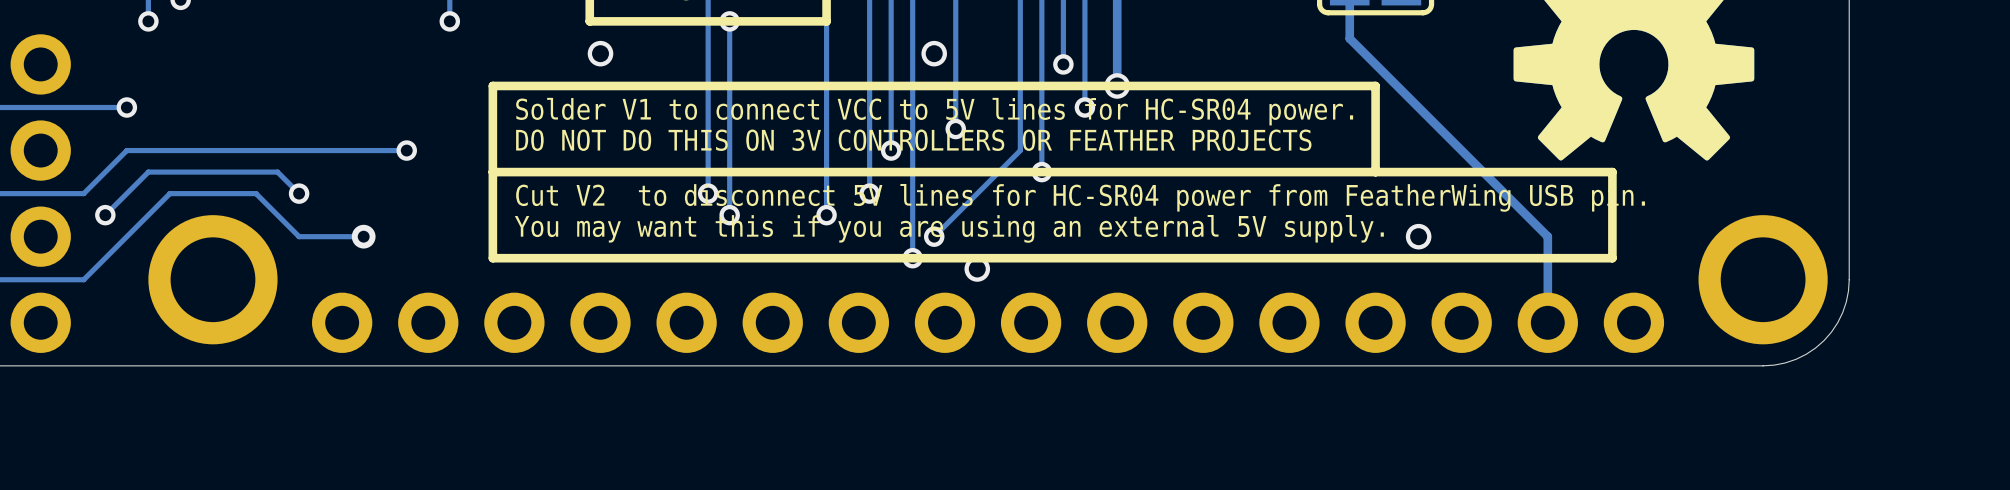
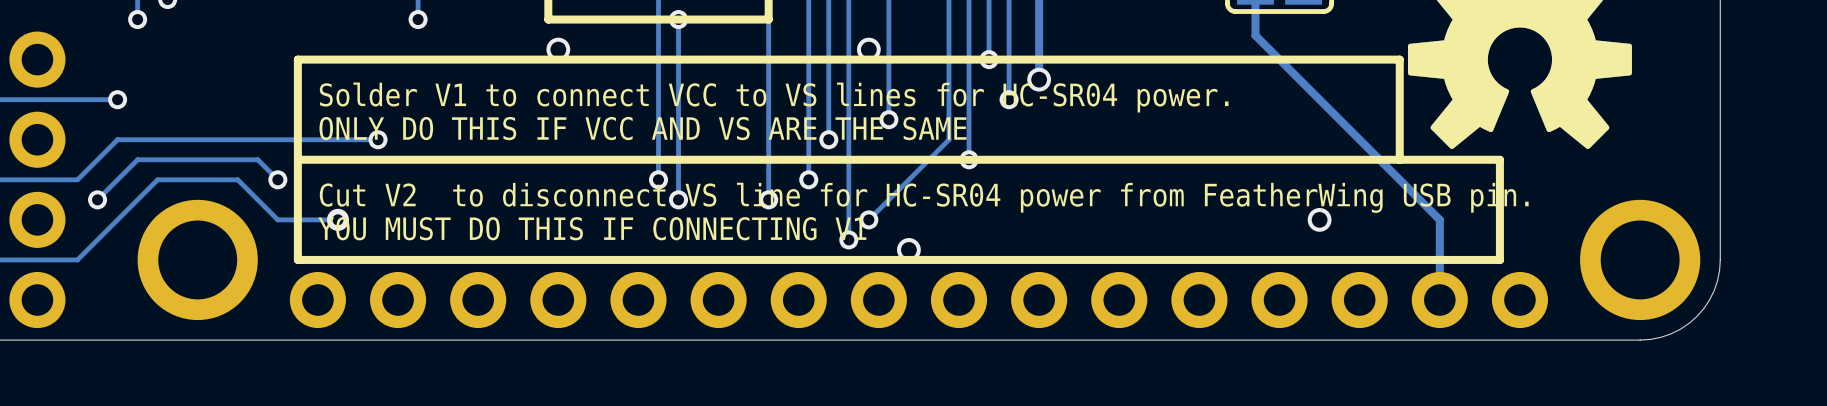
text: Solder V1 to connect VCC to 5V lines for HC-SR04 power. (934, 111) -> Solder V1 to connect VCC to VS lines for HC-SR04 power. (774, 97)
text: none -> ONLY DO THIS IF VCC AND VS ARE THE SAME (643, 128)
text: DO NOT DO THIS ON 3V CONTROLLERS OR FEATHER PROJECTS (913, 140) -> none
line: none -> (458, 159) (297, 159)
line: (1375, 172) (1375, 85) (492, 85) (492, 258) (1612, 258) -> (1399, 159) (1399, 59) (297, 59) (297, 259) (1499, 259) (1499, 239)
text: Cut V2 to disconnect 5V lines for HC-SR04 power from FeatherWing USB pin. (1080, 197) -> Cut V2 to disconnect VS line for HC-SR04 power from FeatherWing USB pin. (924, 197)
text: You may want this if you are using an external 5V supply. (949, 228) -> none
text: none -> YOU MUST DO THIS IF CONNECTING V1 (592, 228)

